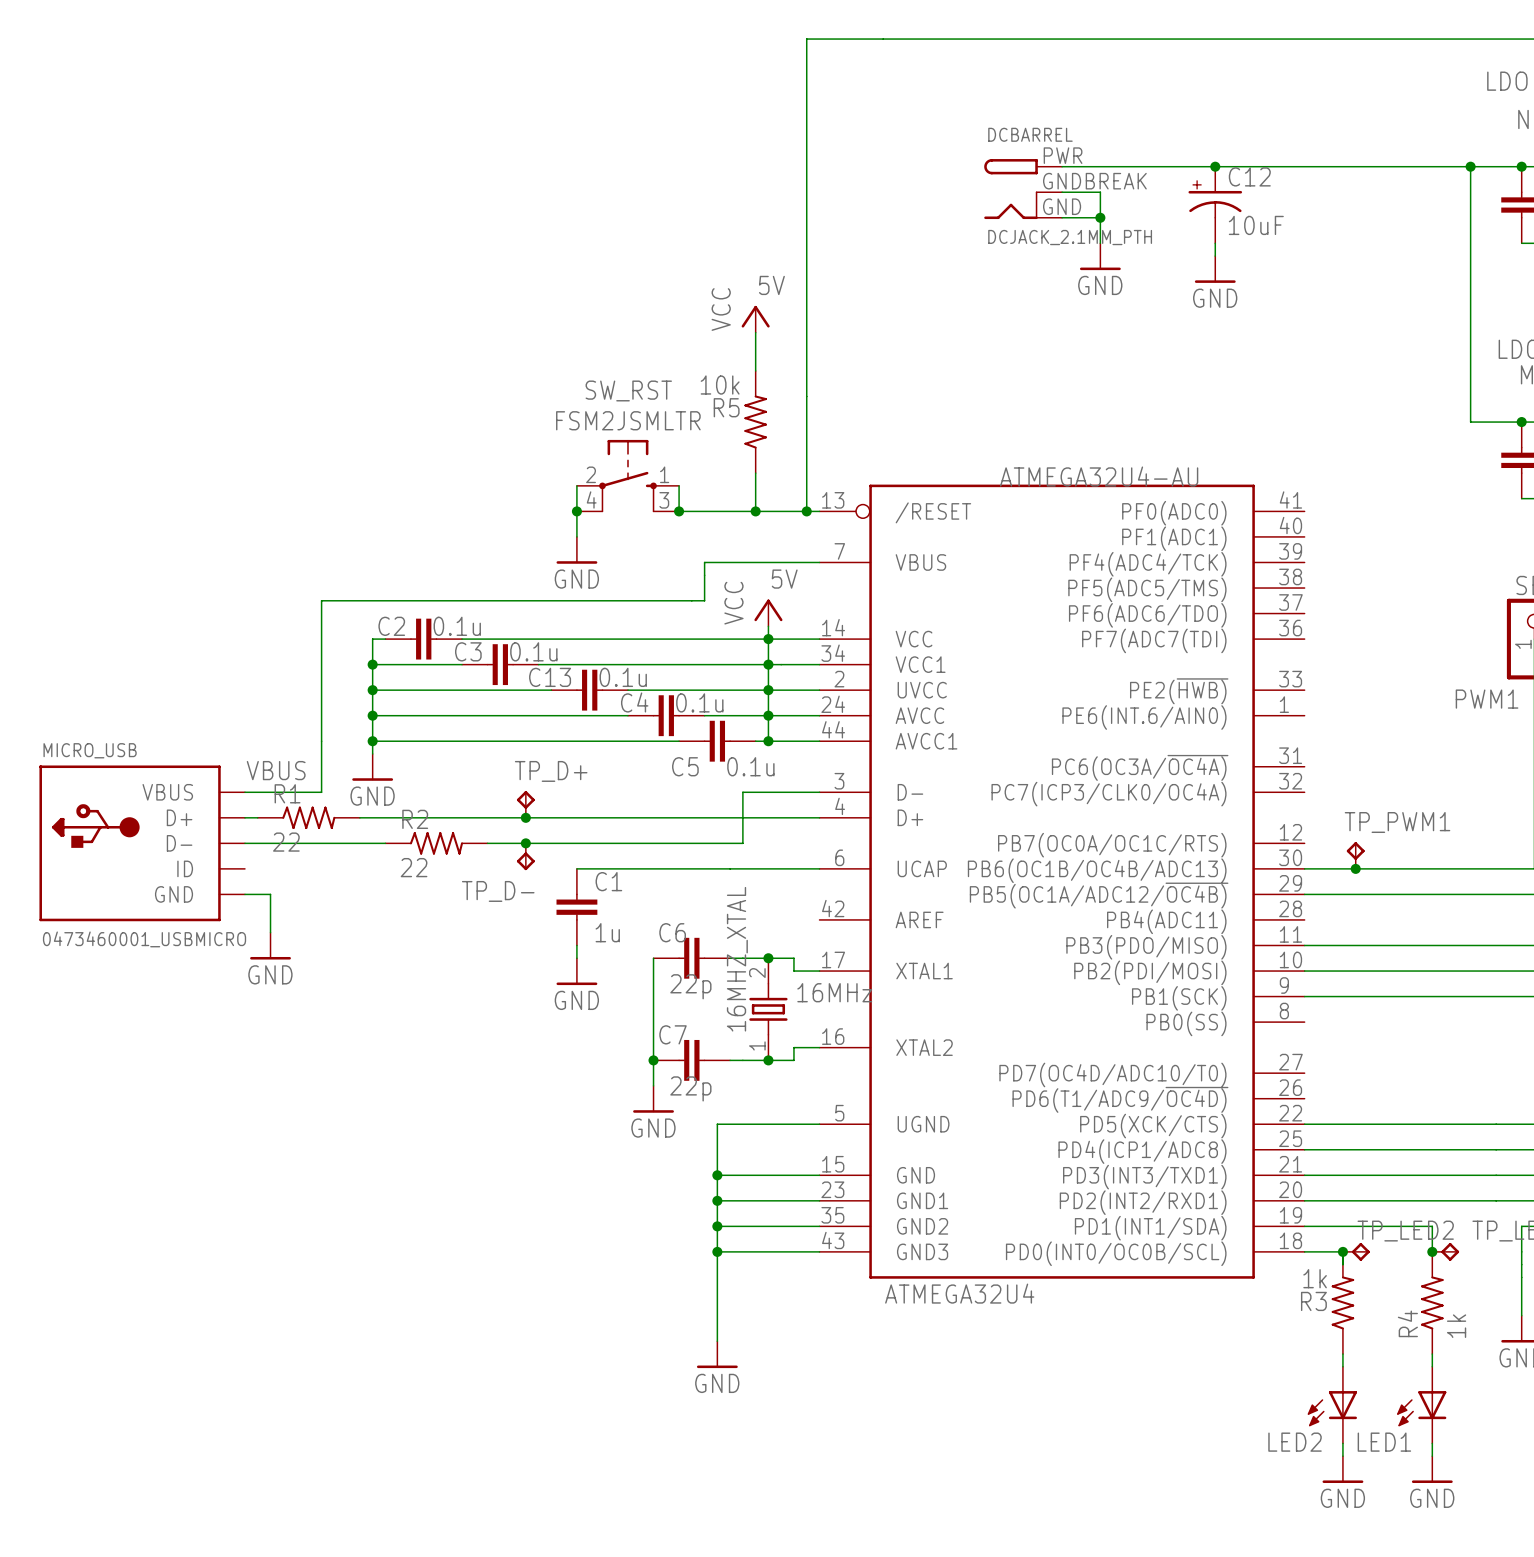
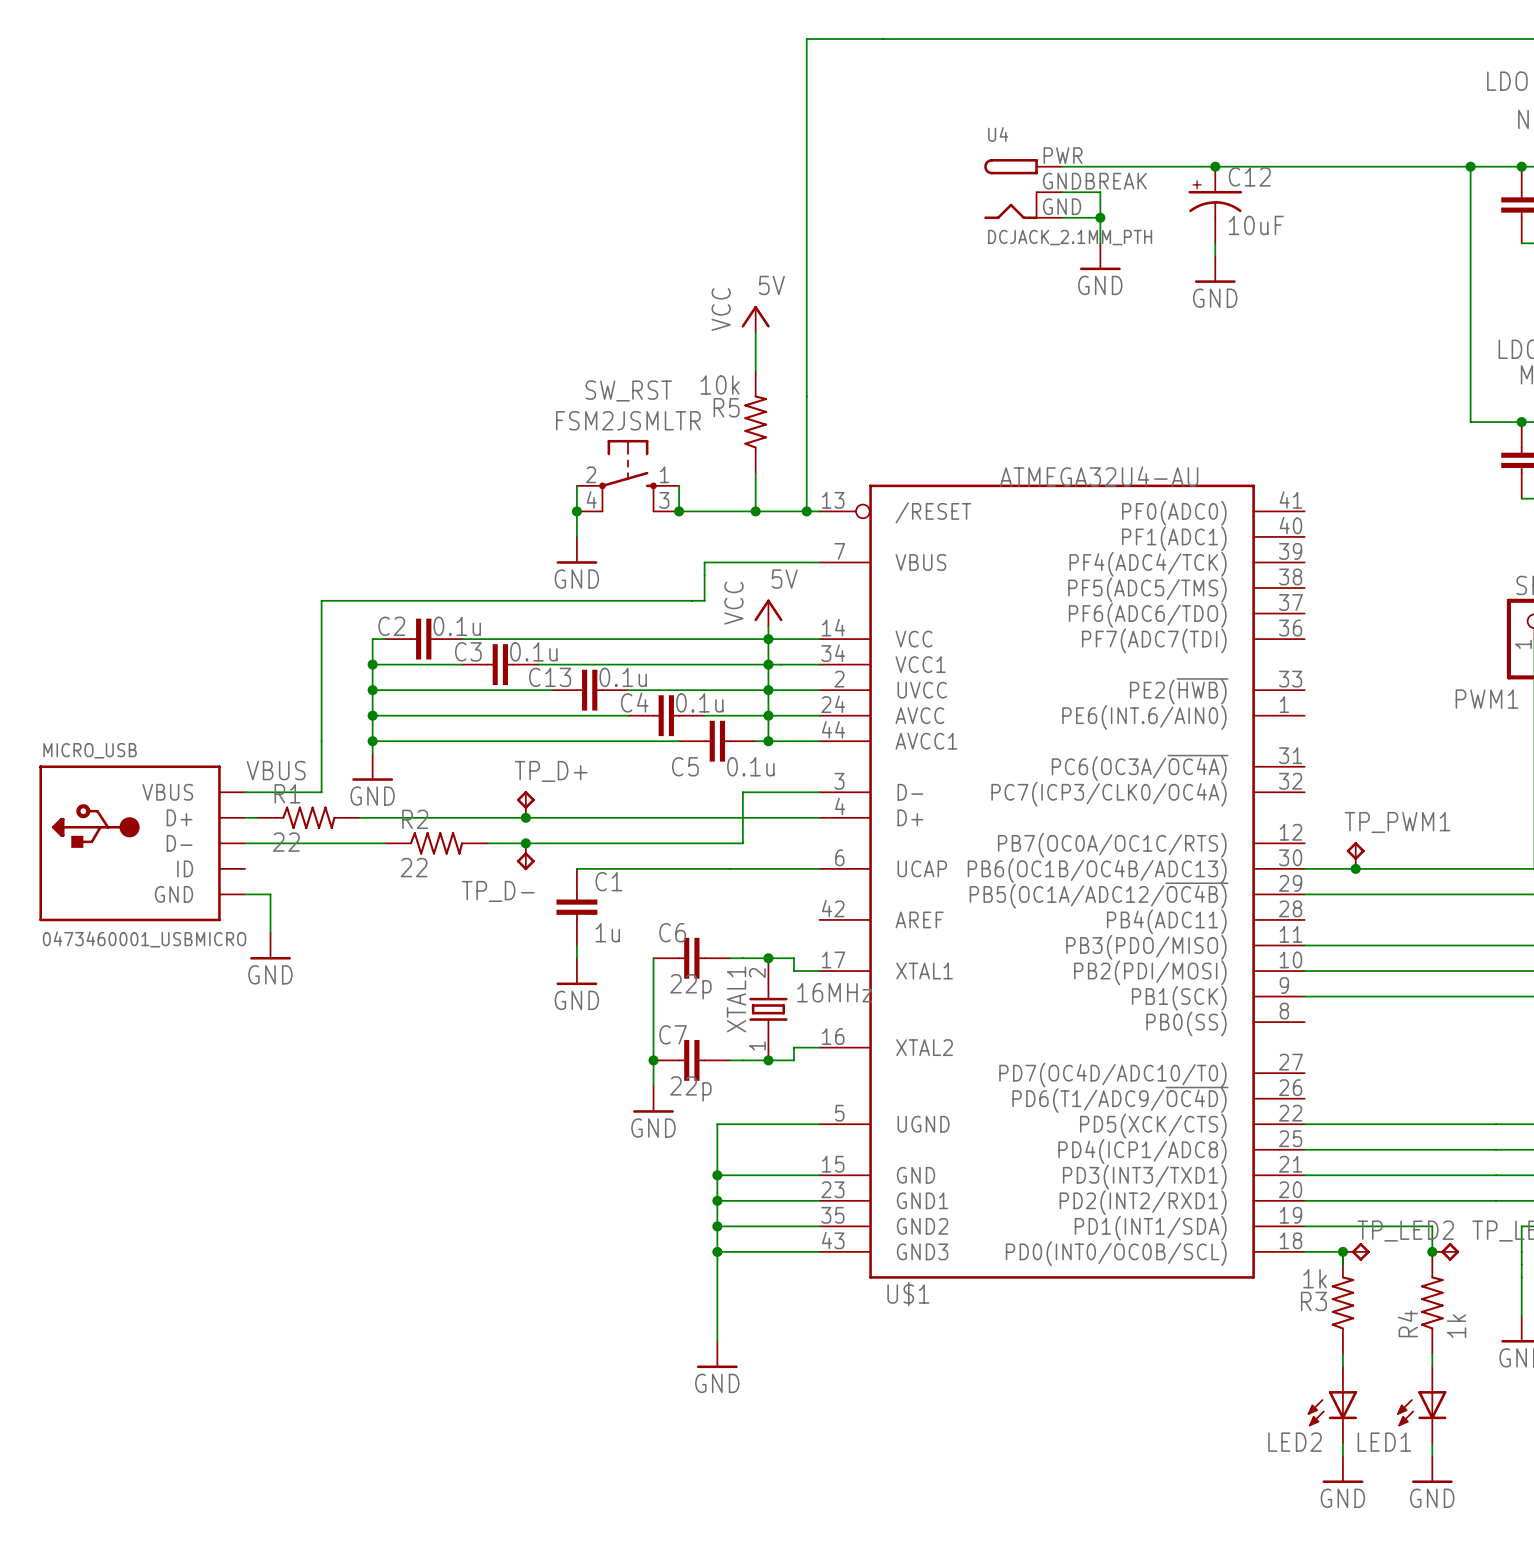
DCBARREL name: DCBARREL (1030, 134) -> U4 (998, 134)
16MHZ_XTAL name: 16MHZ_XTAL (737, 959) -> XTAL1 (736, 999)
ATMEGA32U4 name: ATMEGA32U4 (959, 1293) -> U$1 (908, 1294)

